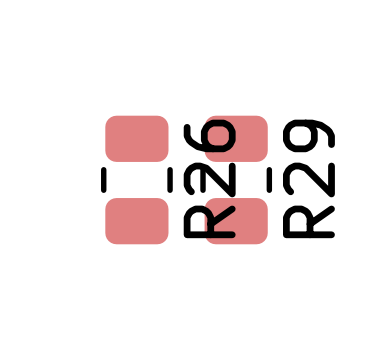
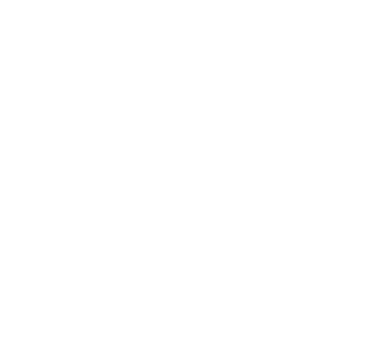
R26: (136, 179) -> none
R29: (236, 179) -> none

